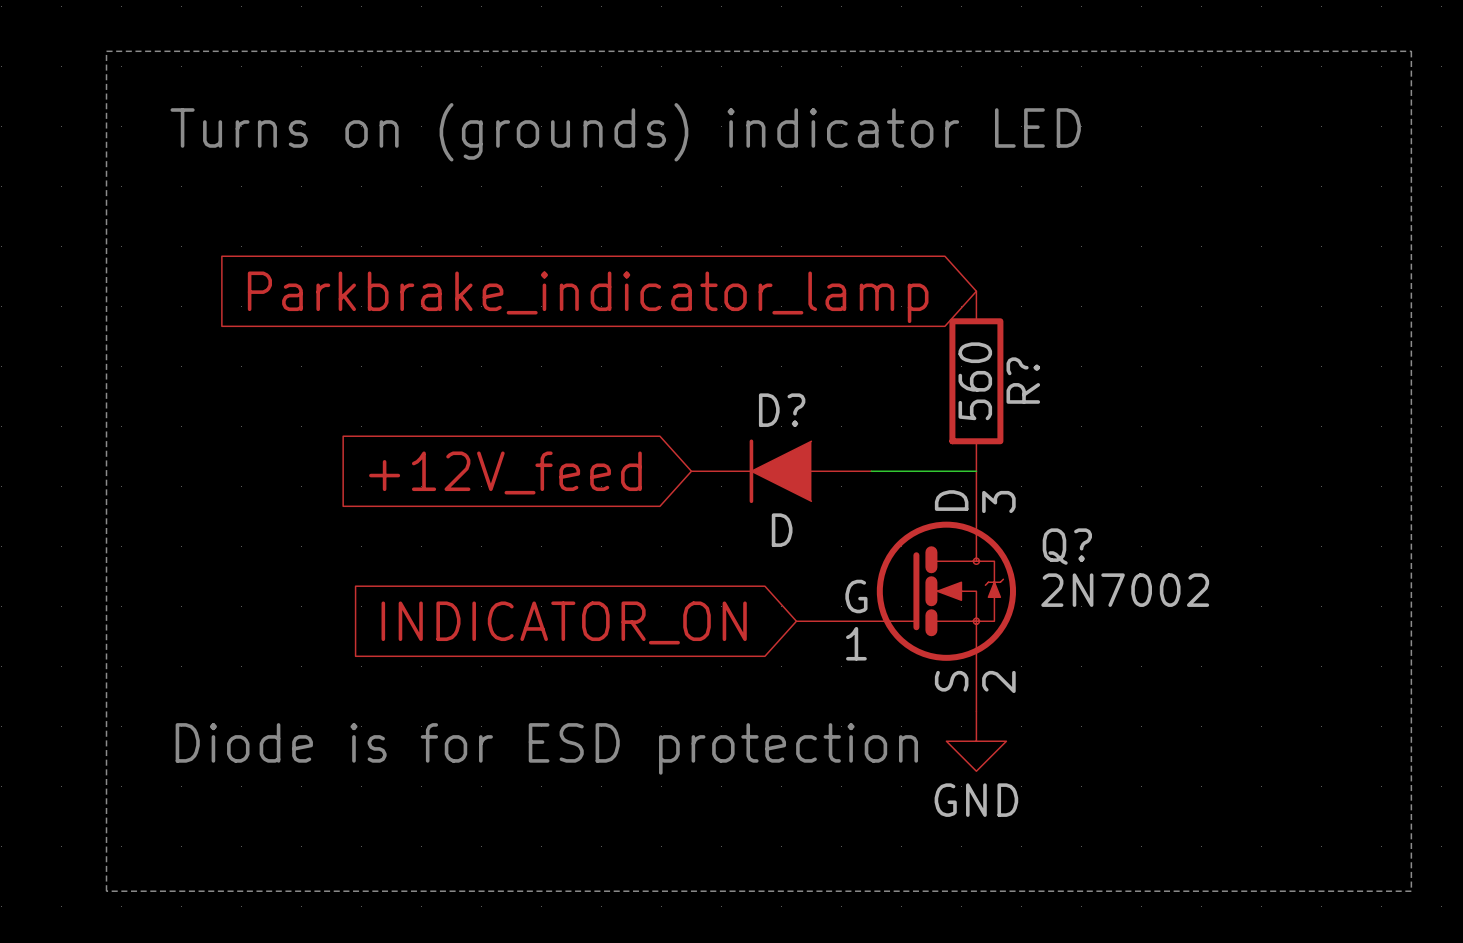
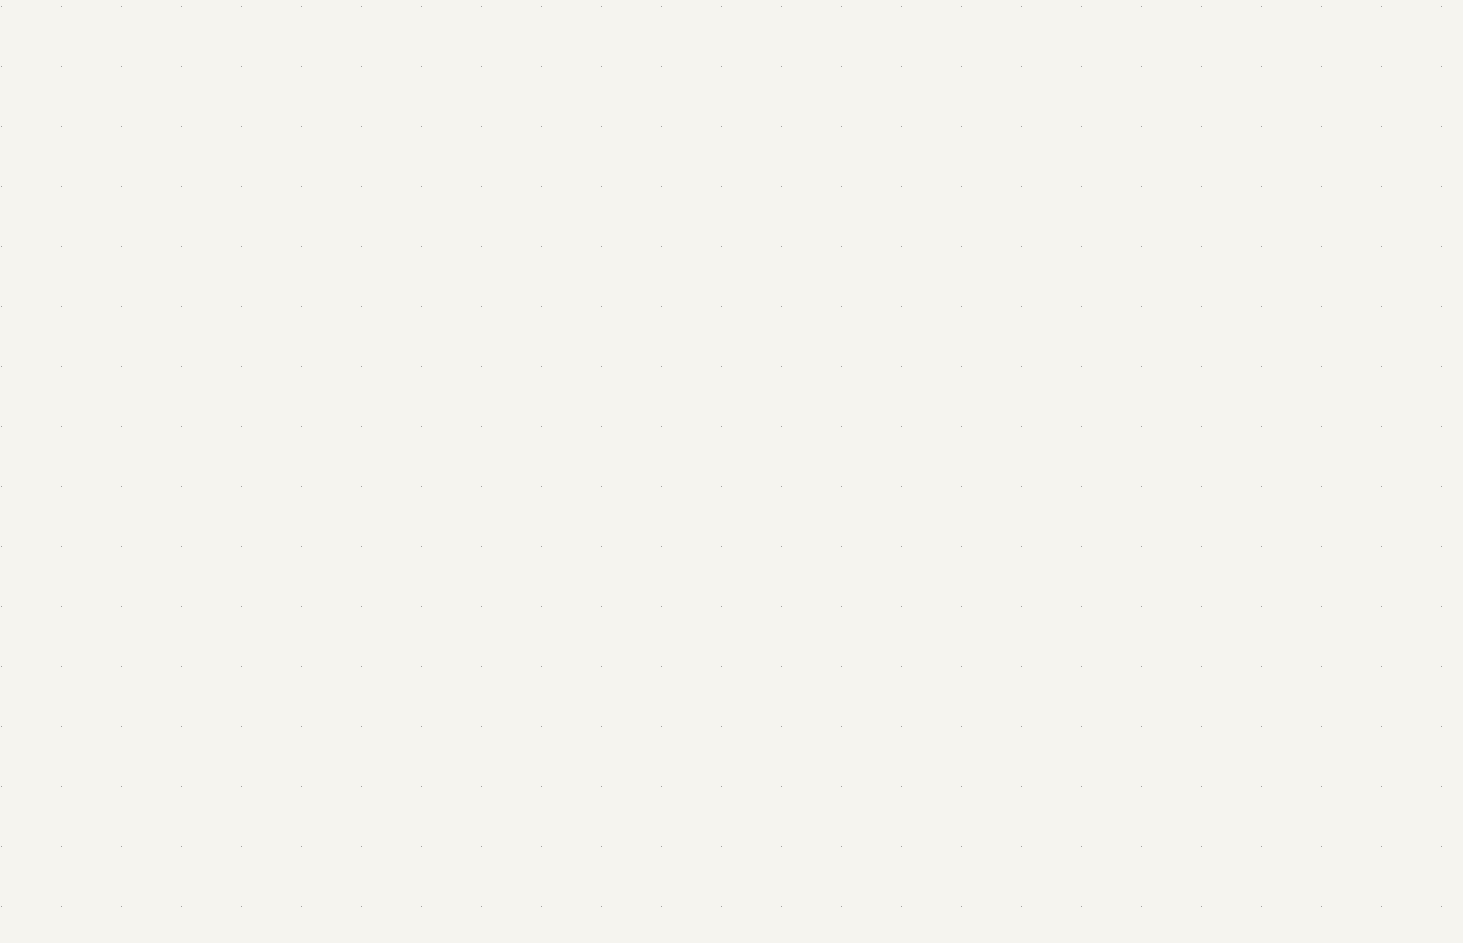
line: (106, 51) (1411, 51) (1411, 891) (106, 891) (106, 51) -> none
text: Turns on (grounds) indicator LED (625, 132) -> none
global label: Parkbrake_indicator_lamp (588, 297) -> none
R?: 560 (976, 381) -> none
D?: D (781, 471) -> none
wire: (871, 471) (976, 471) -> none
global label: +12V_feed (505, 472) -> none
Q?: 2N7002 (906, 591) -> none
global label: INDICATOR_ON (564, 622) -> none
power symbol: GND (976, 741) -> none
text: Diode is for ESD protection (546, 748) -> none

